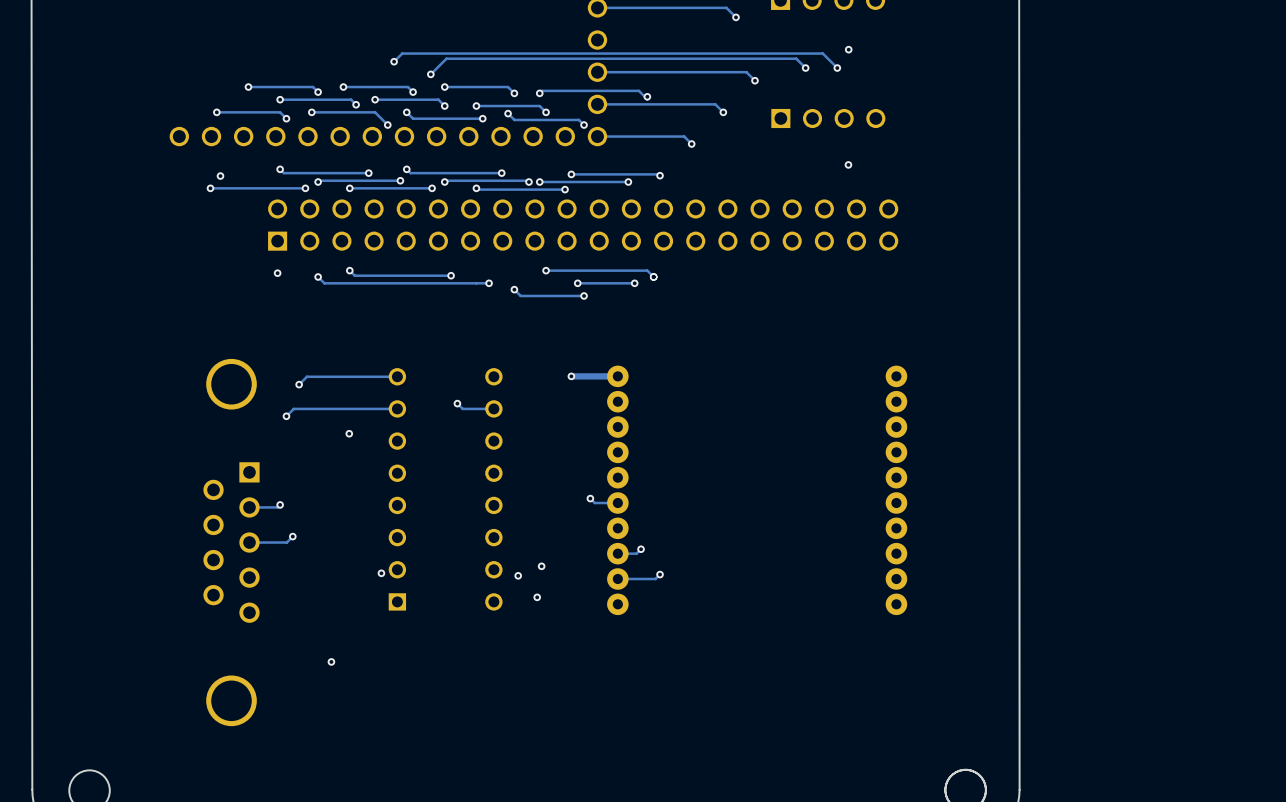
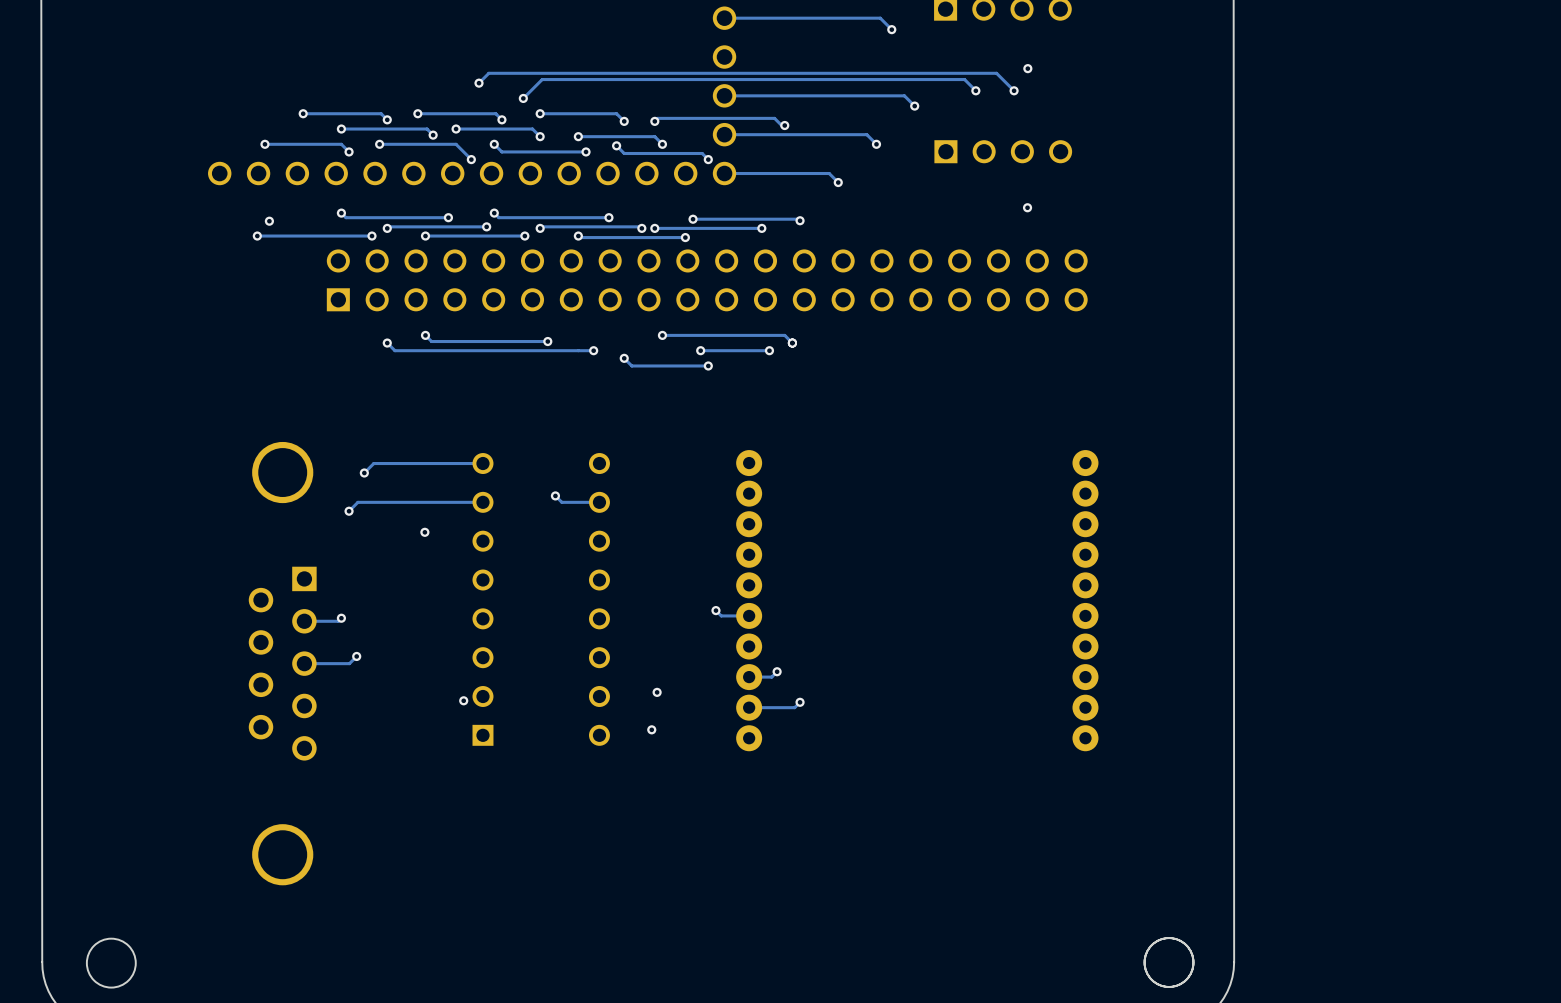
via: (277, 273) -> none
via: (571, 376) -> none
track: (617, 376) (571, 376) -> none
via: (518, 575) -> none
via: (331, 661) -> none

